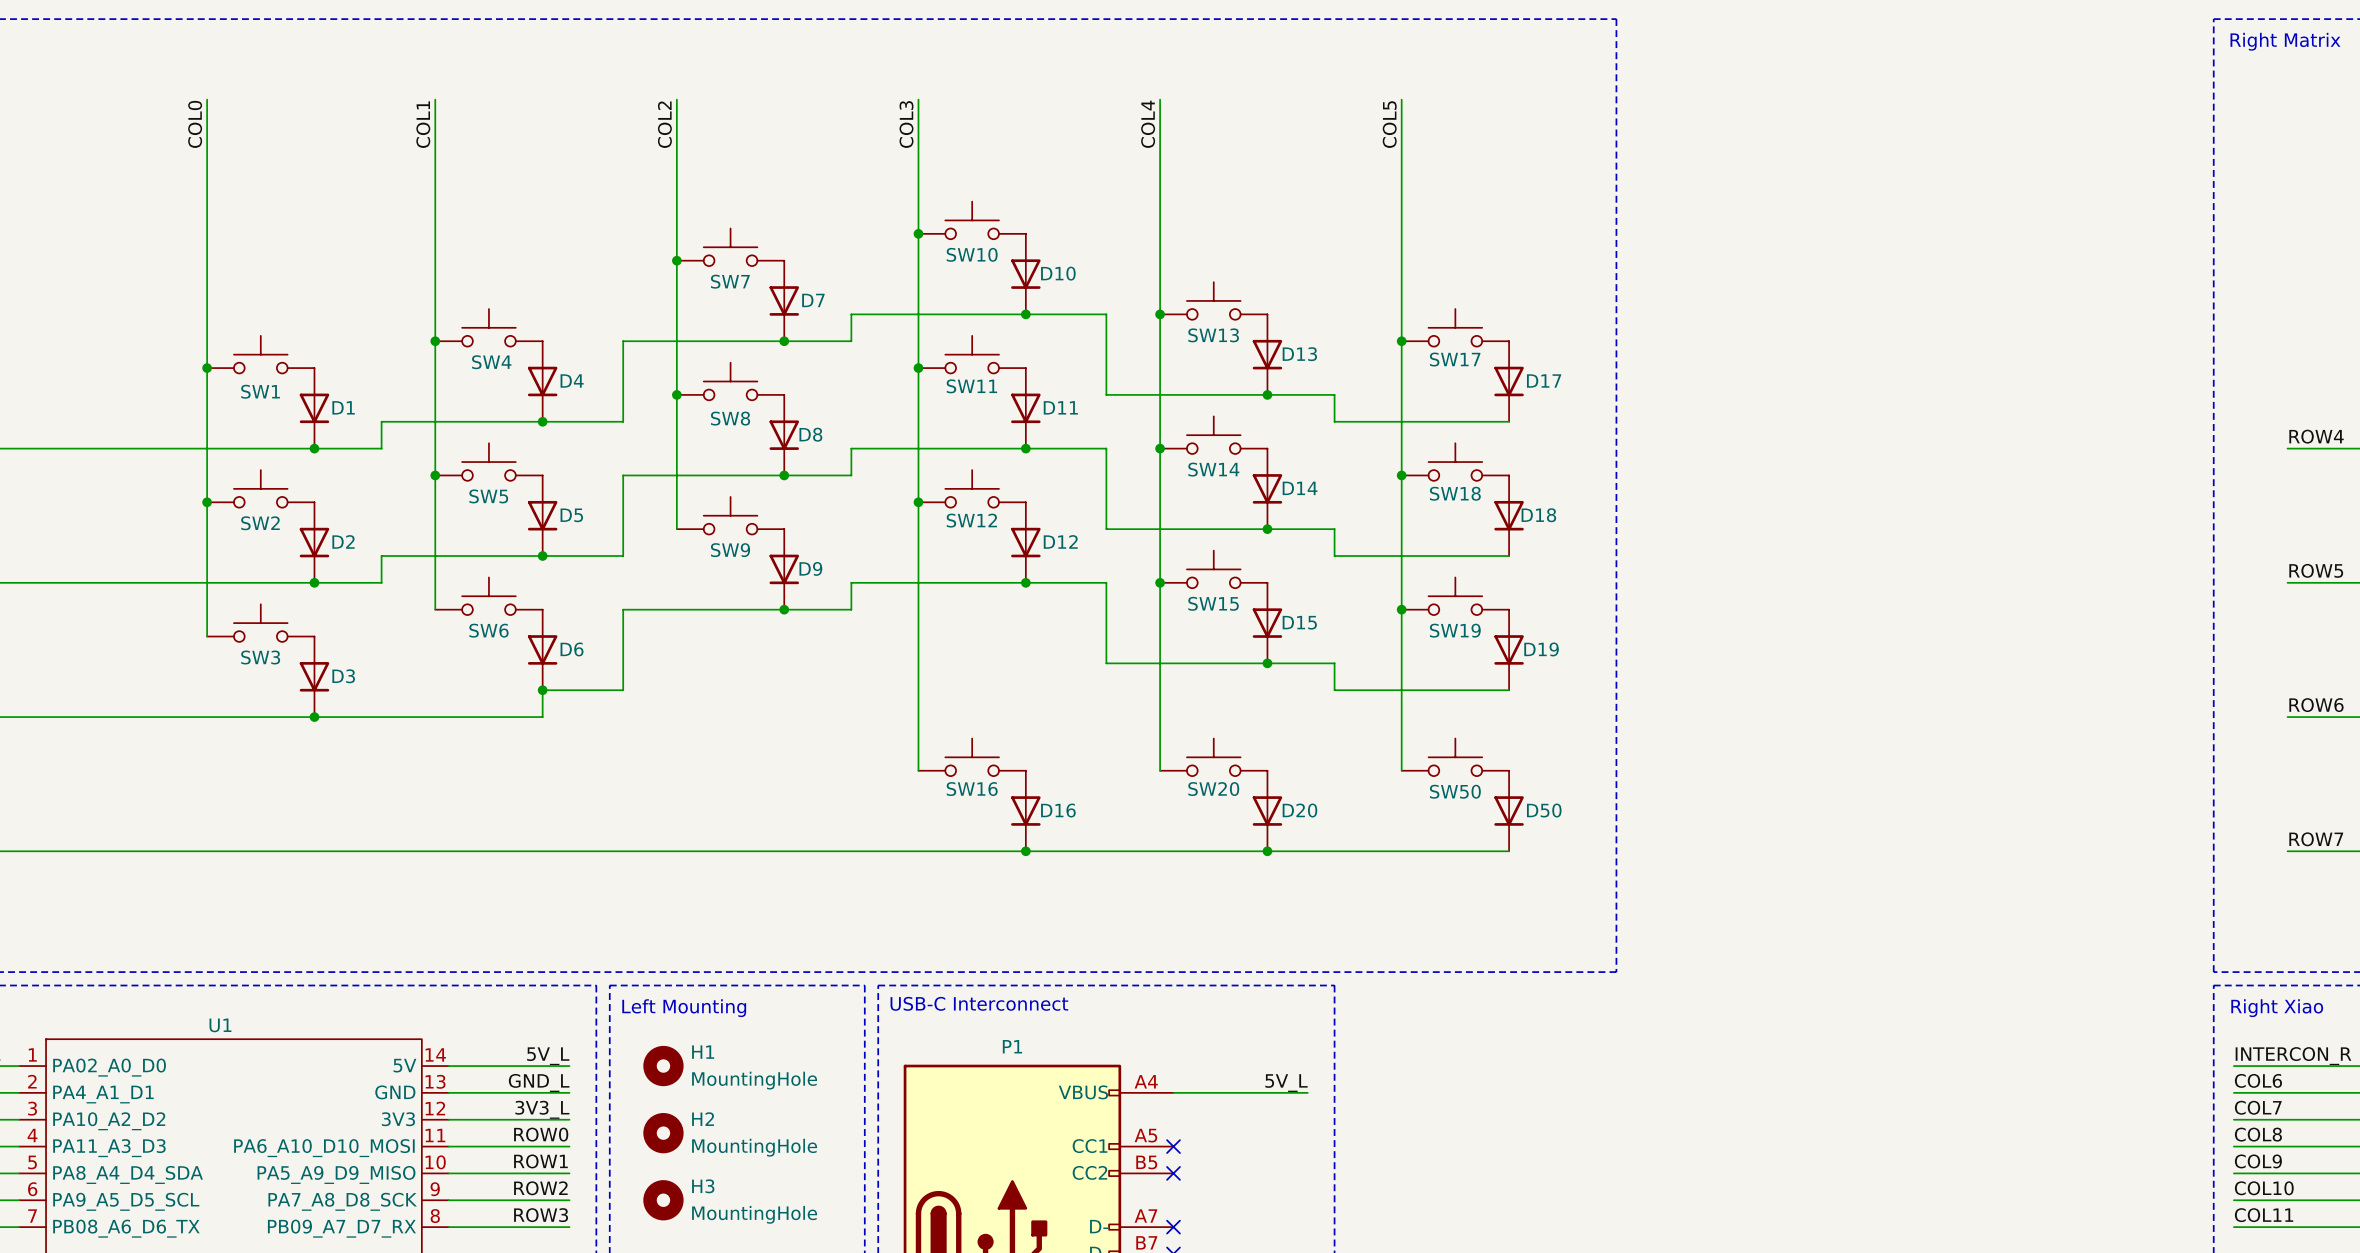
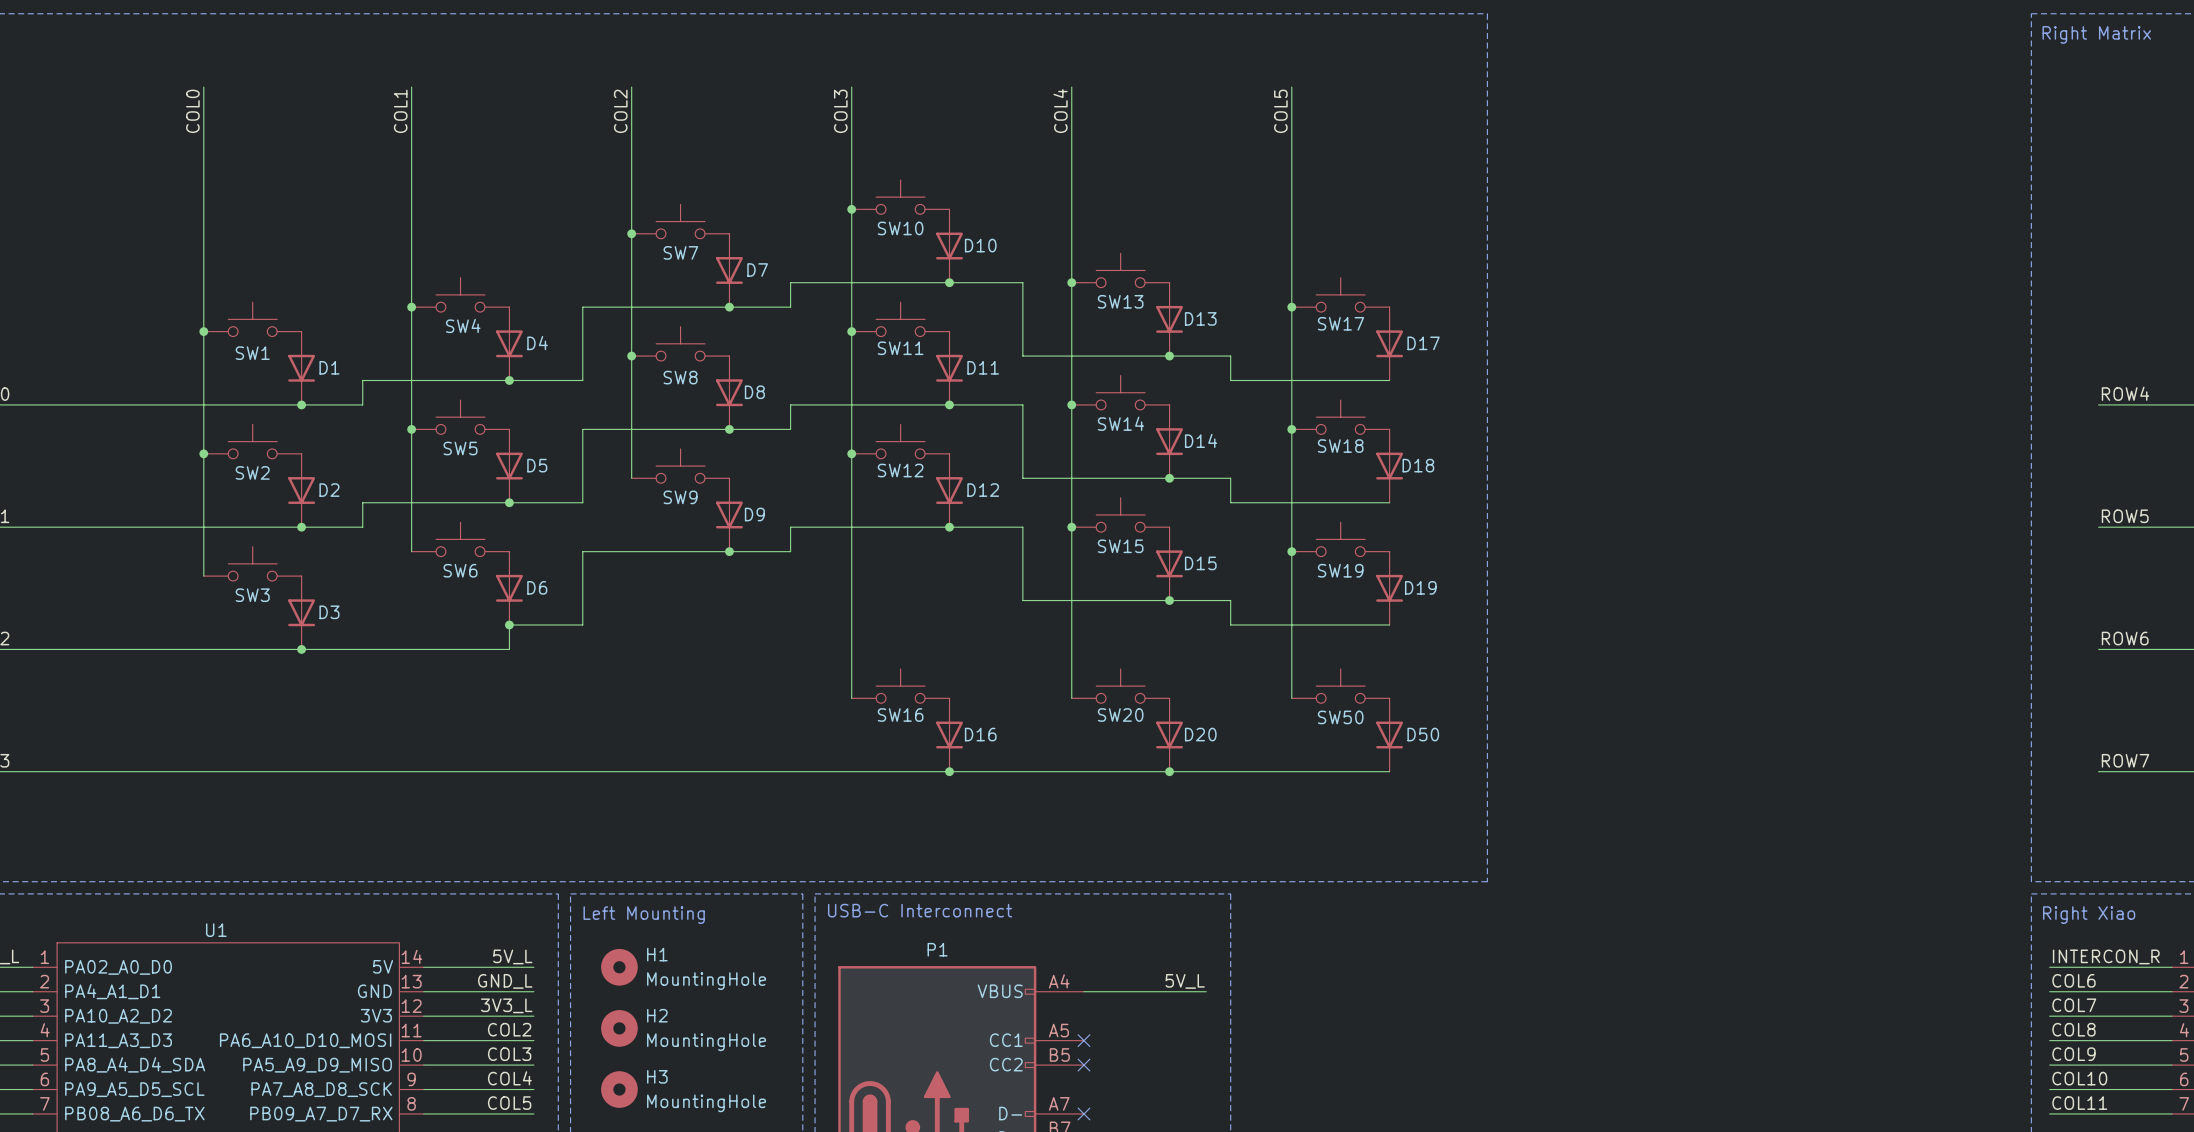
label: ROW0 (541, 1134) -> COL2 (509, 1029)
label: ROW1 (540, 1161) -> COL3 (509, 1054)
label: ROW2 (540, 1188) -> COL4 (509, 1078)
label: ROW3 (541, 1215) -> COL5 (509, 1103)

